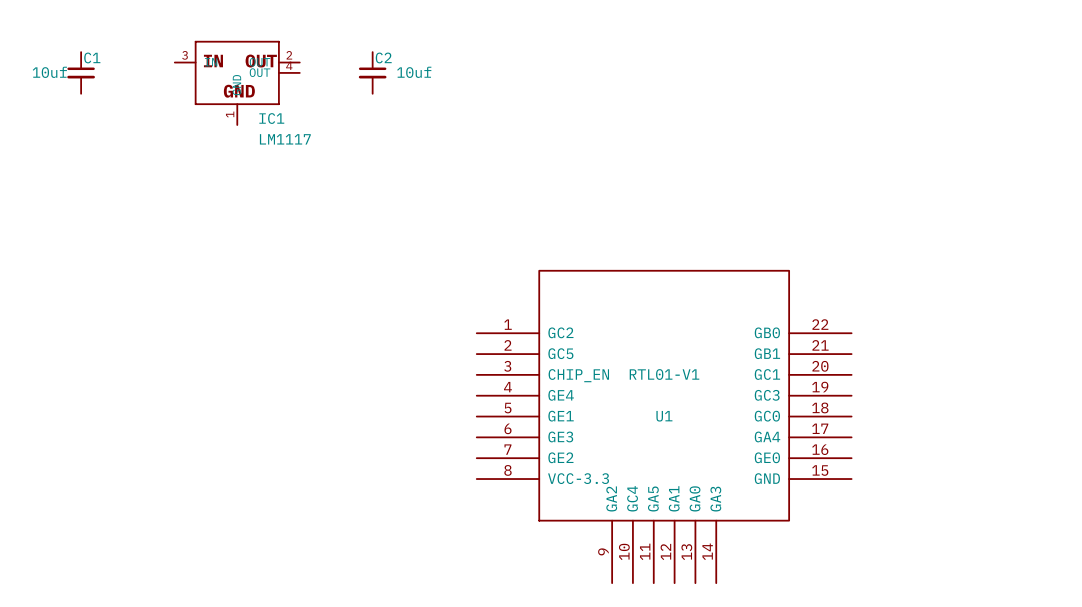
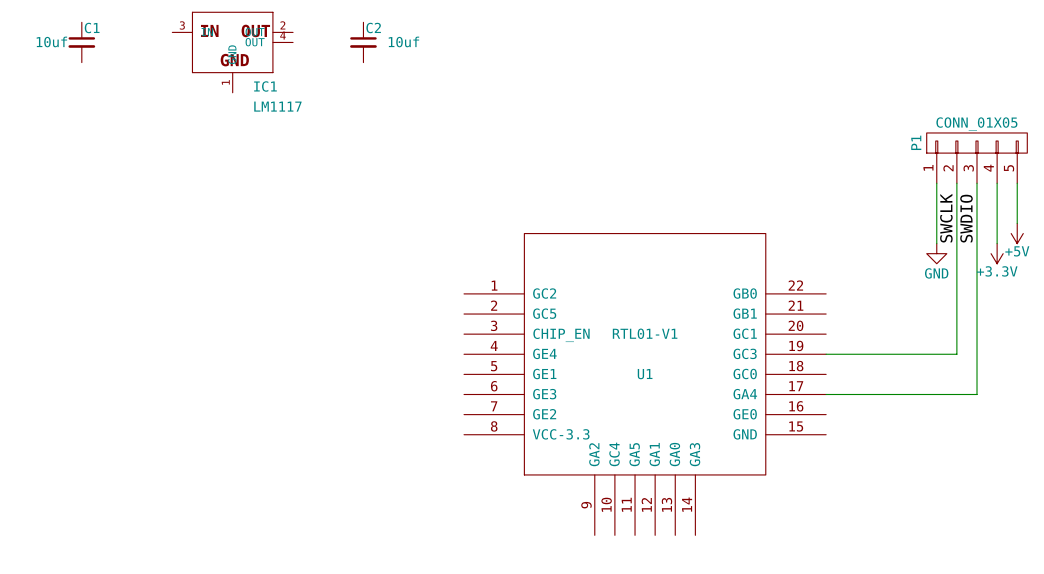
P1: none -> CONN_01X05 (977, 158)
wire: none -> (936, 183) (936, 243)
wire: none -> (956, 183) (956, 354) (826, 354)
wire: none -> (977, 183) (977, 394) (826, 394)
wire: none -> (997, 183) (997, 243)
wire: none -> (1017, 183) (1017, 223)
label: none -> SWCLK (946, 218)
label: none -> SWDIO (966, 218)
power symbol: none -> +5V (1017, 233)
power symbol: none -> GND (936, 253)
power symbol: none -> +3.3V (997, 253)

